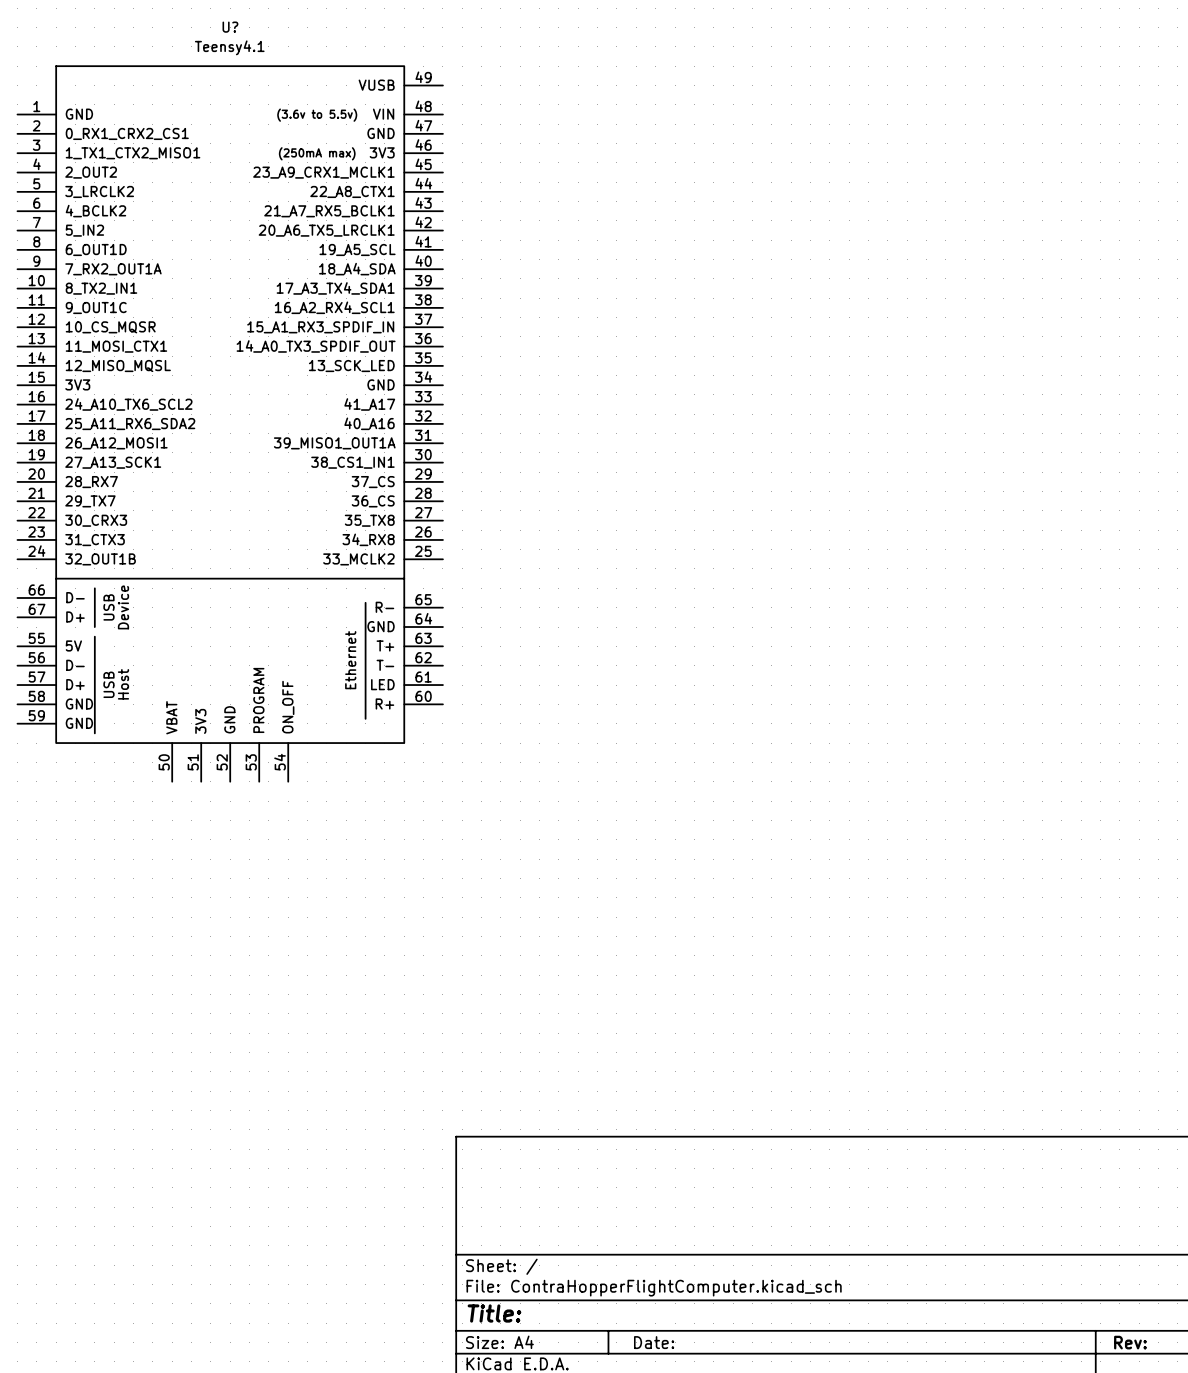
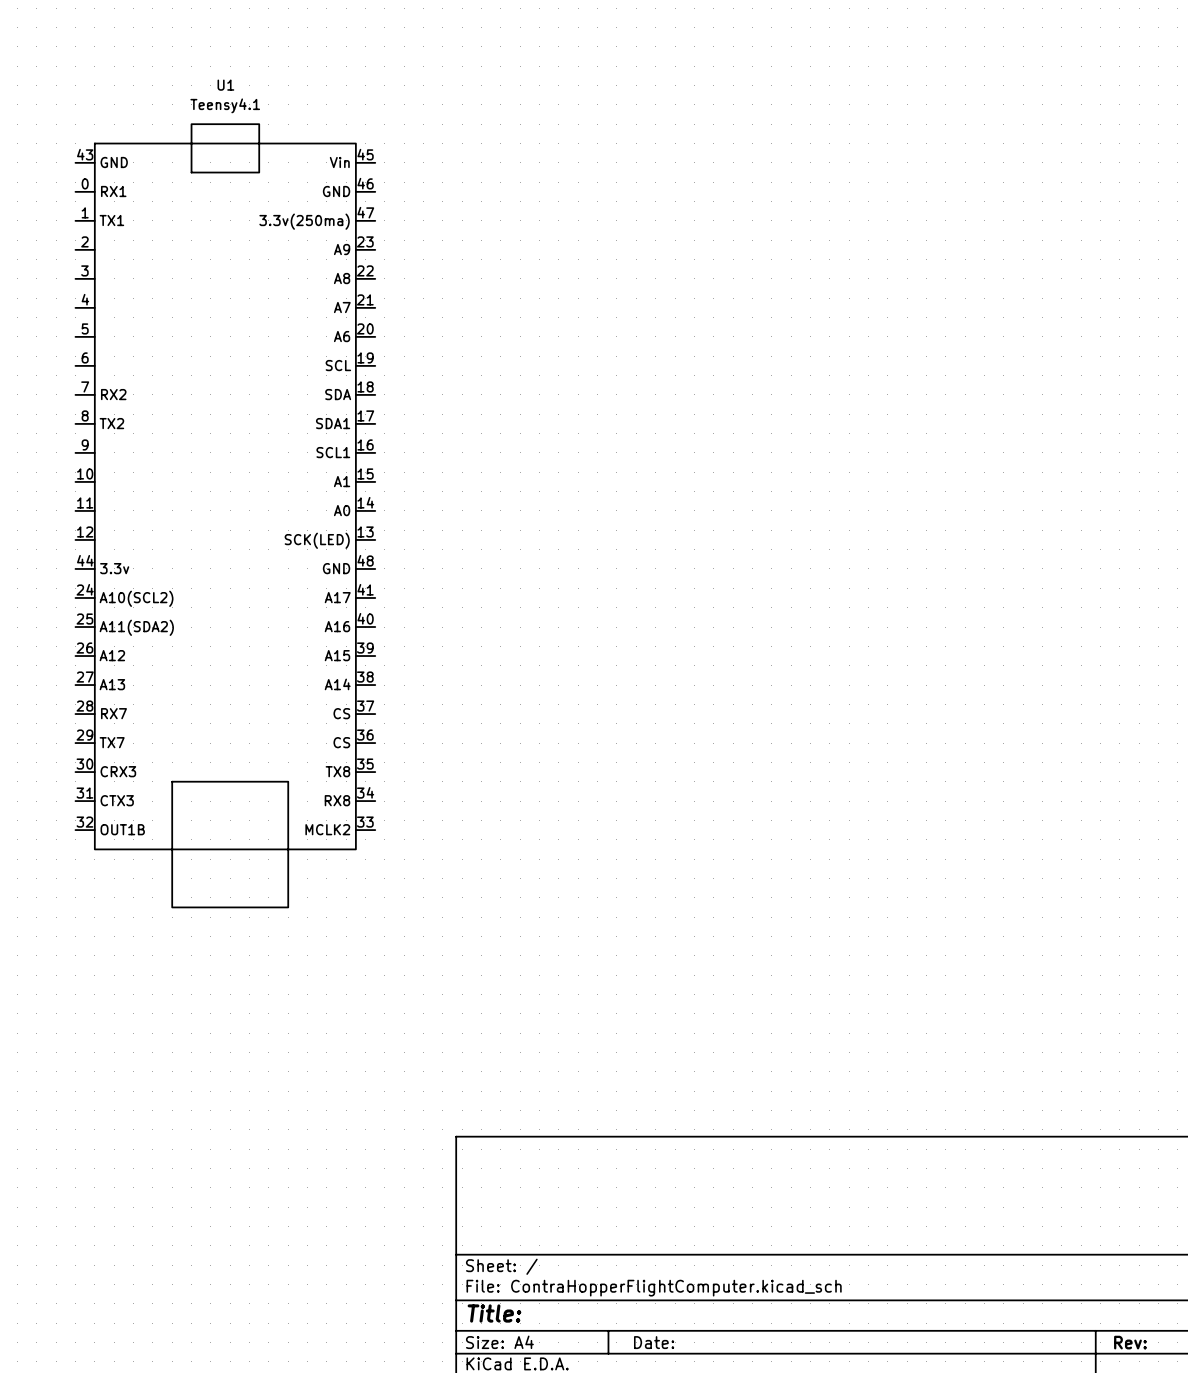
U?: Teensy4.1 (230, 423) -> none
U1: none -> Teensy4.1 (225, 515)

